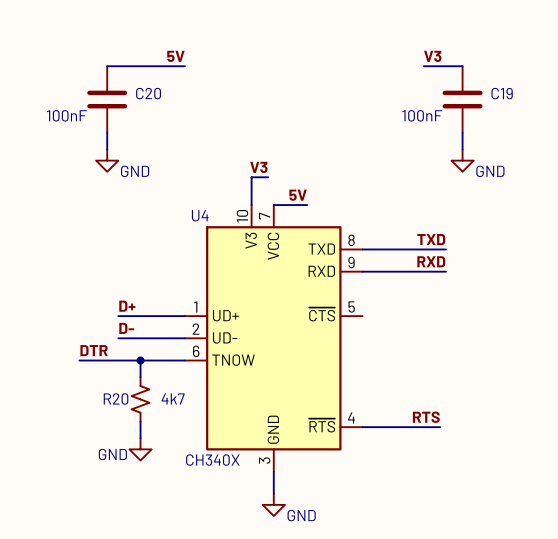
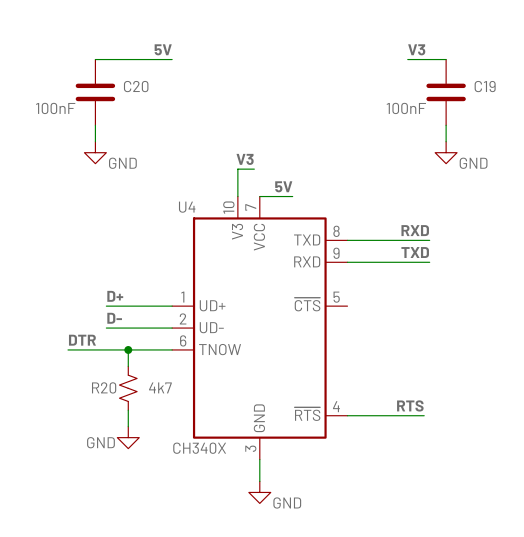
label: TXD (431, 239) -> RXD (415, 230)
label: RXD (431, 261) -> TXD (415, 252)

